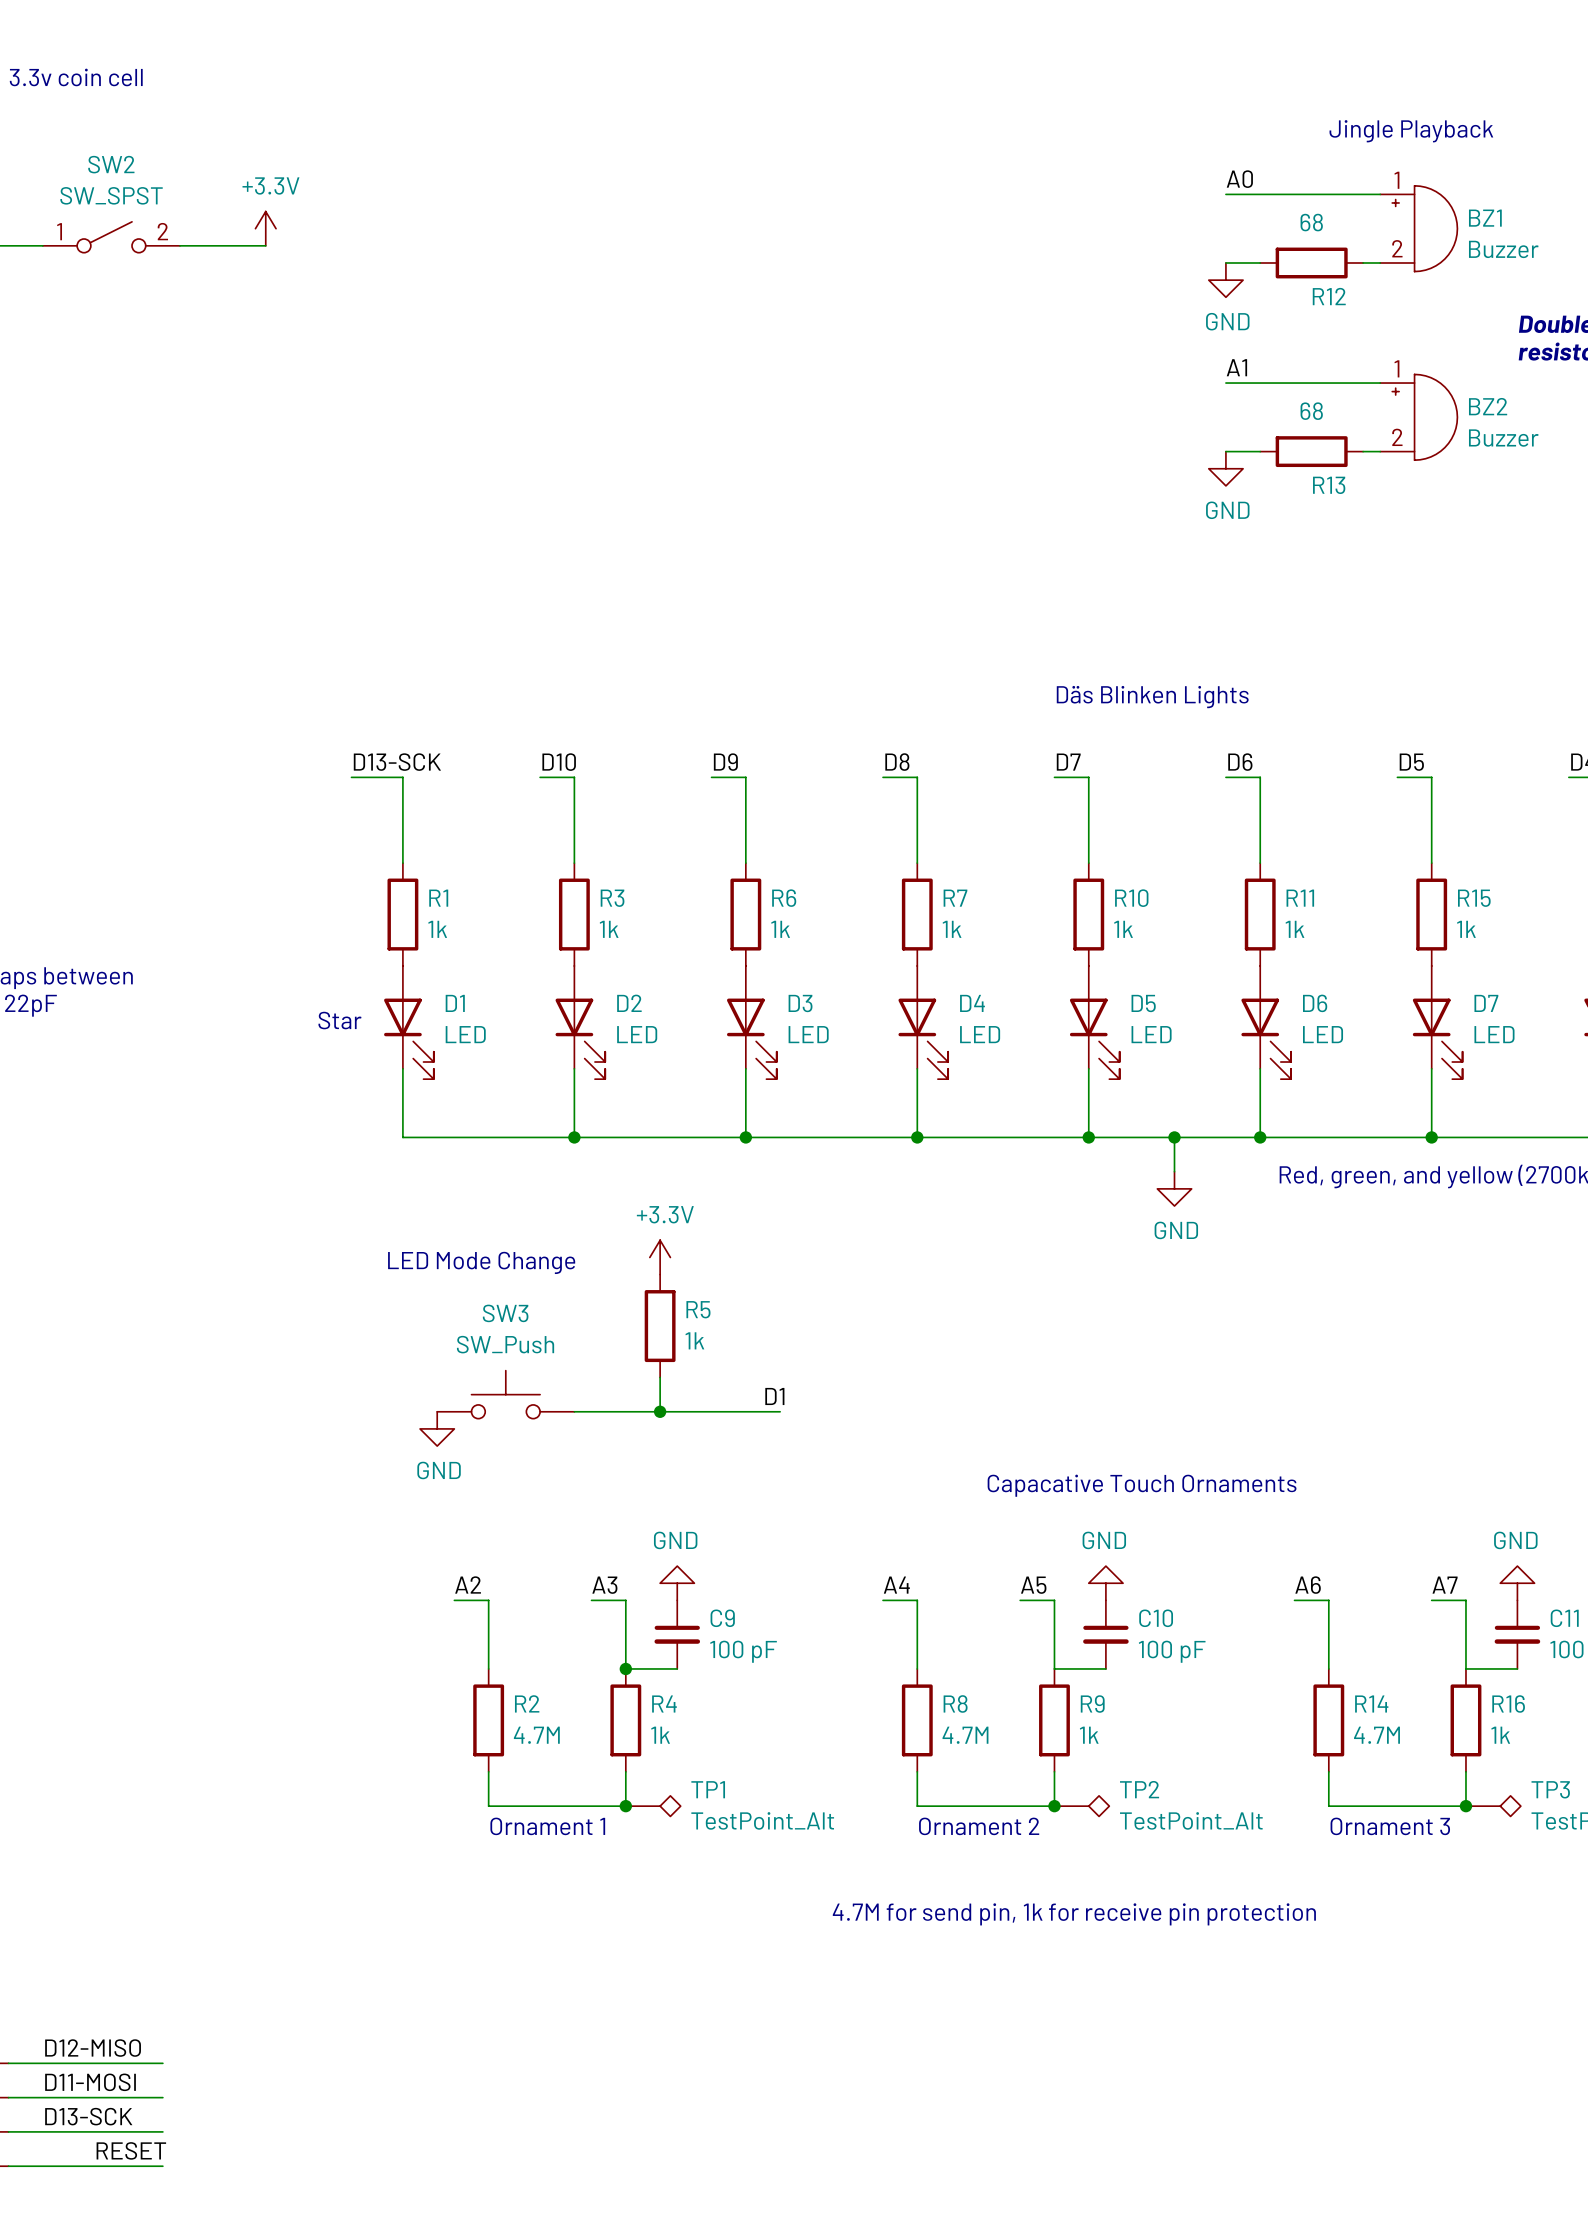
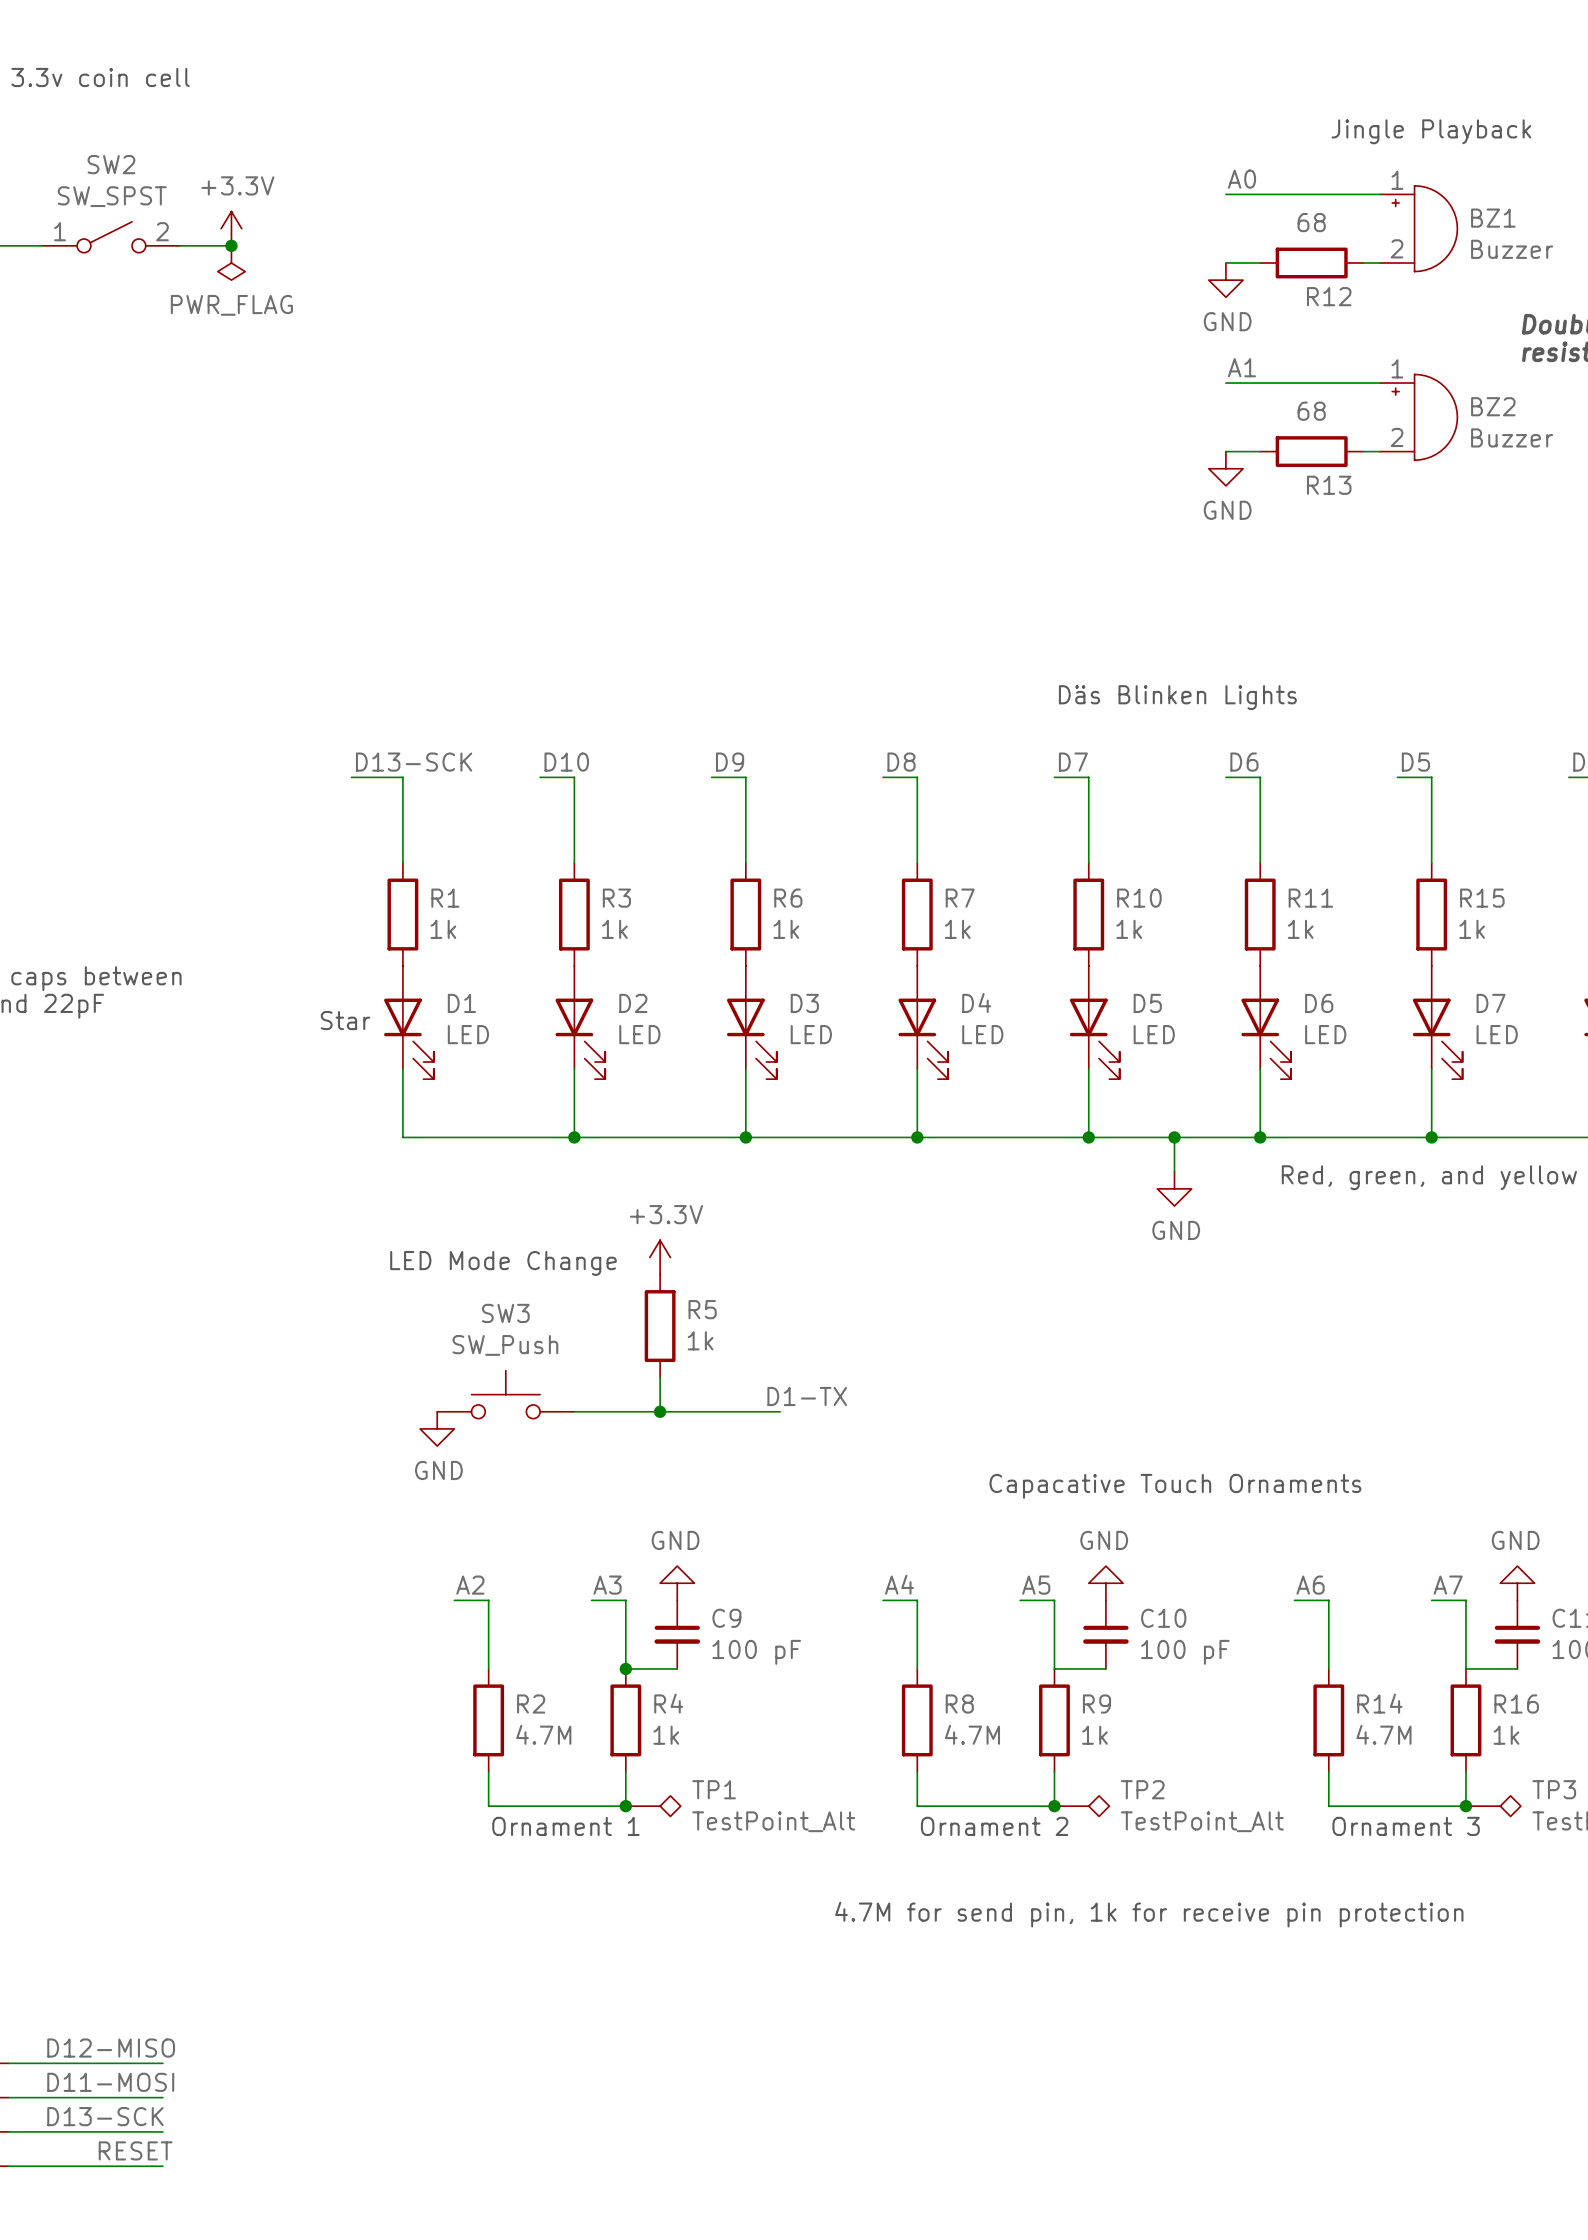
power symbol position: +3.3V (265, 228) -> +3.3V (231, 228)
wire: (231, 245) (265, 245) -> none
junction: none -> (231, 245)
power symbol: none -> PWR_FLAG (231, 262)
label: D1 (774, 1396) -> D1-TX (807, 1396)

